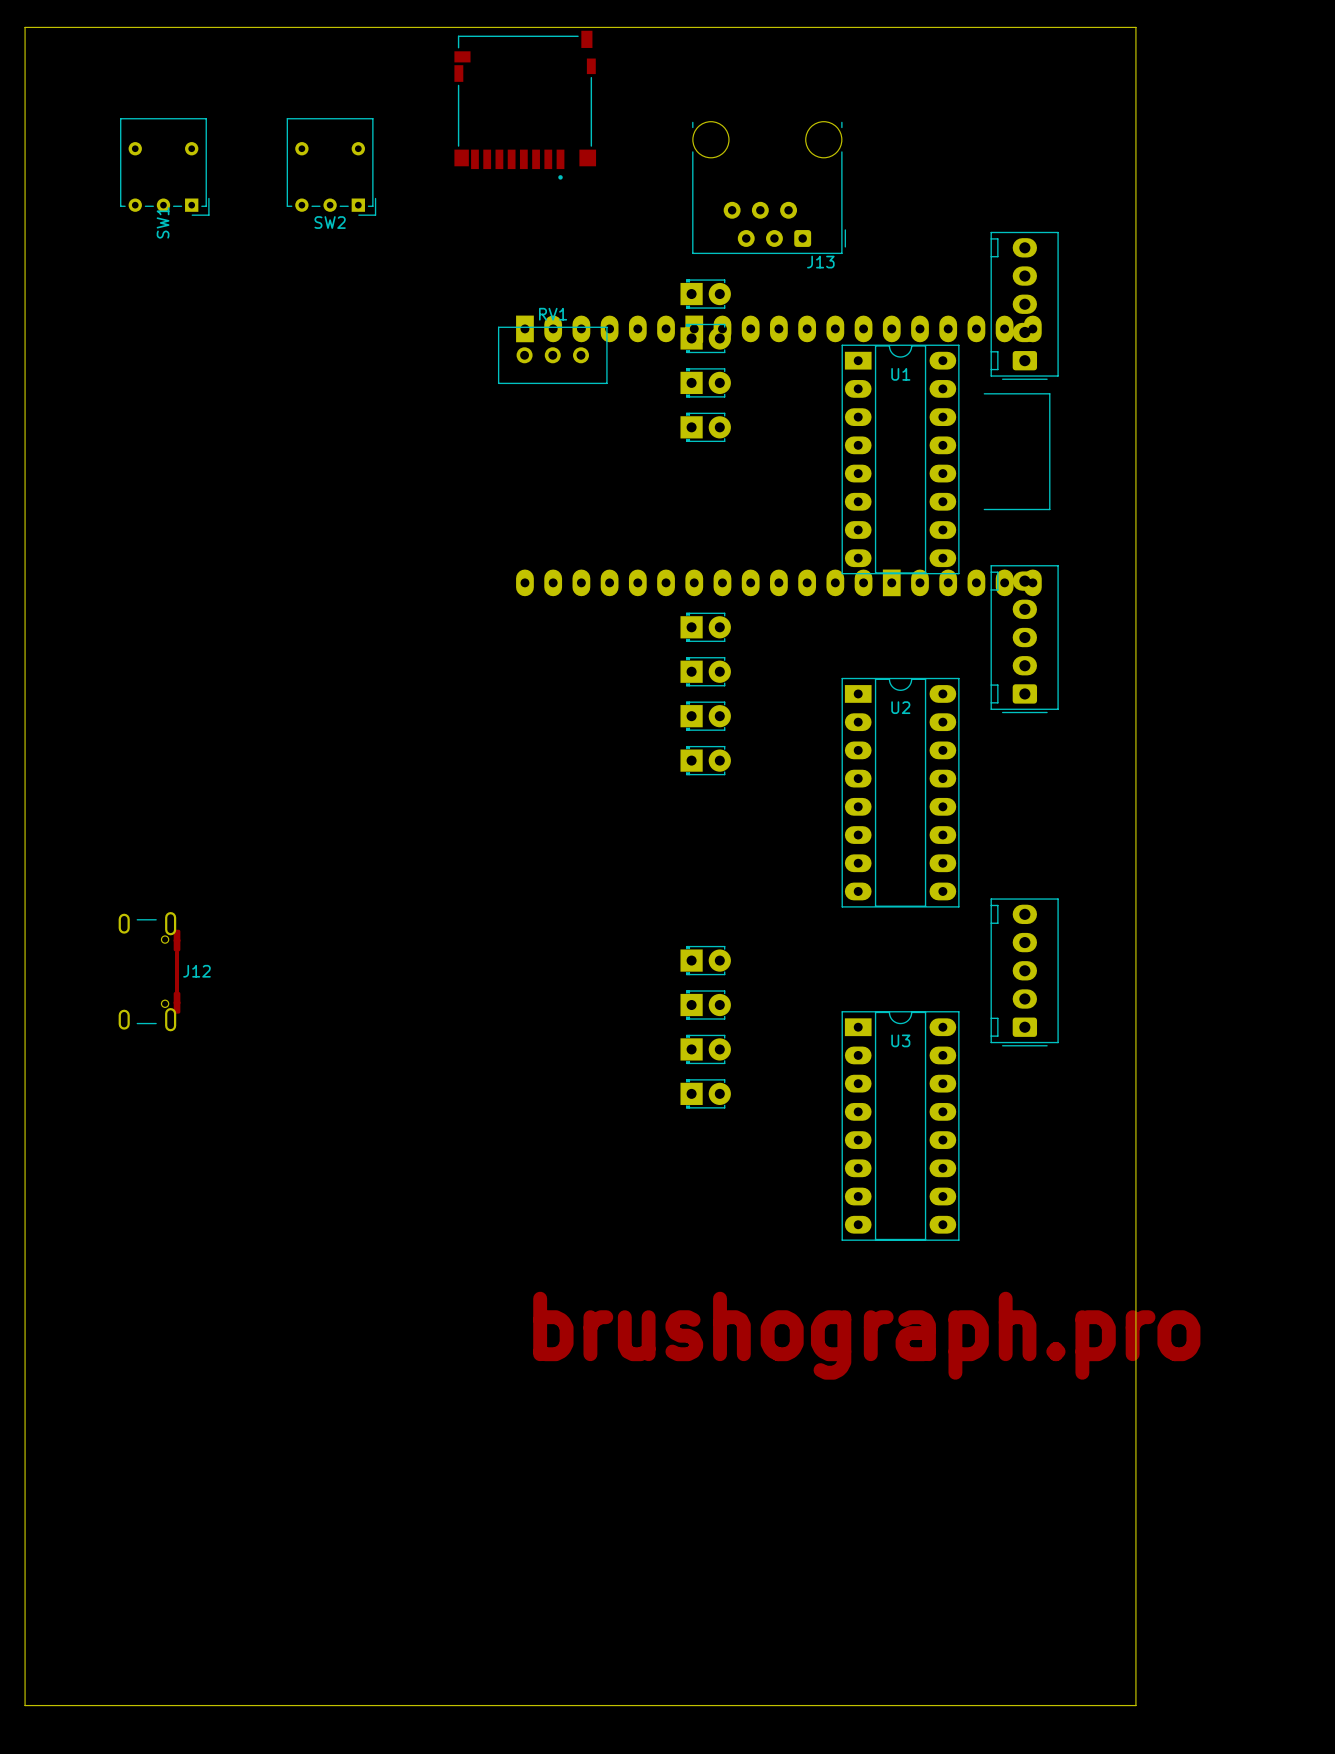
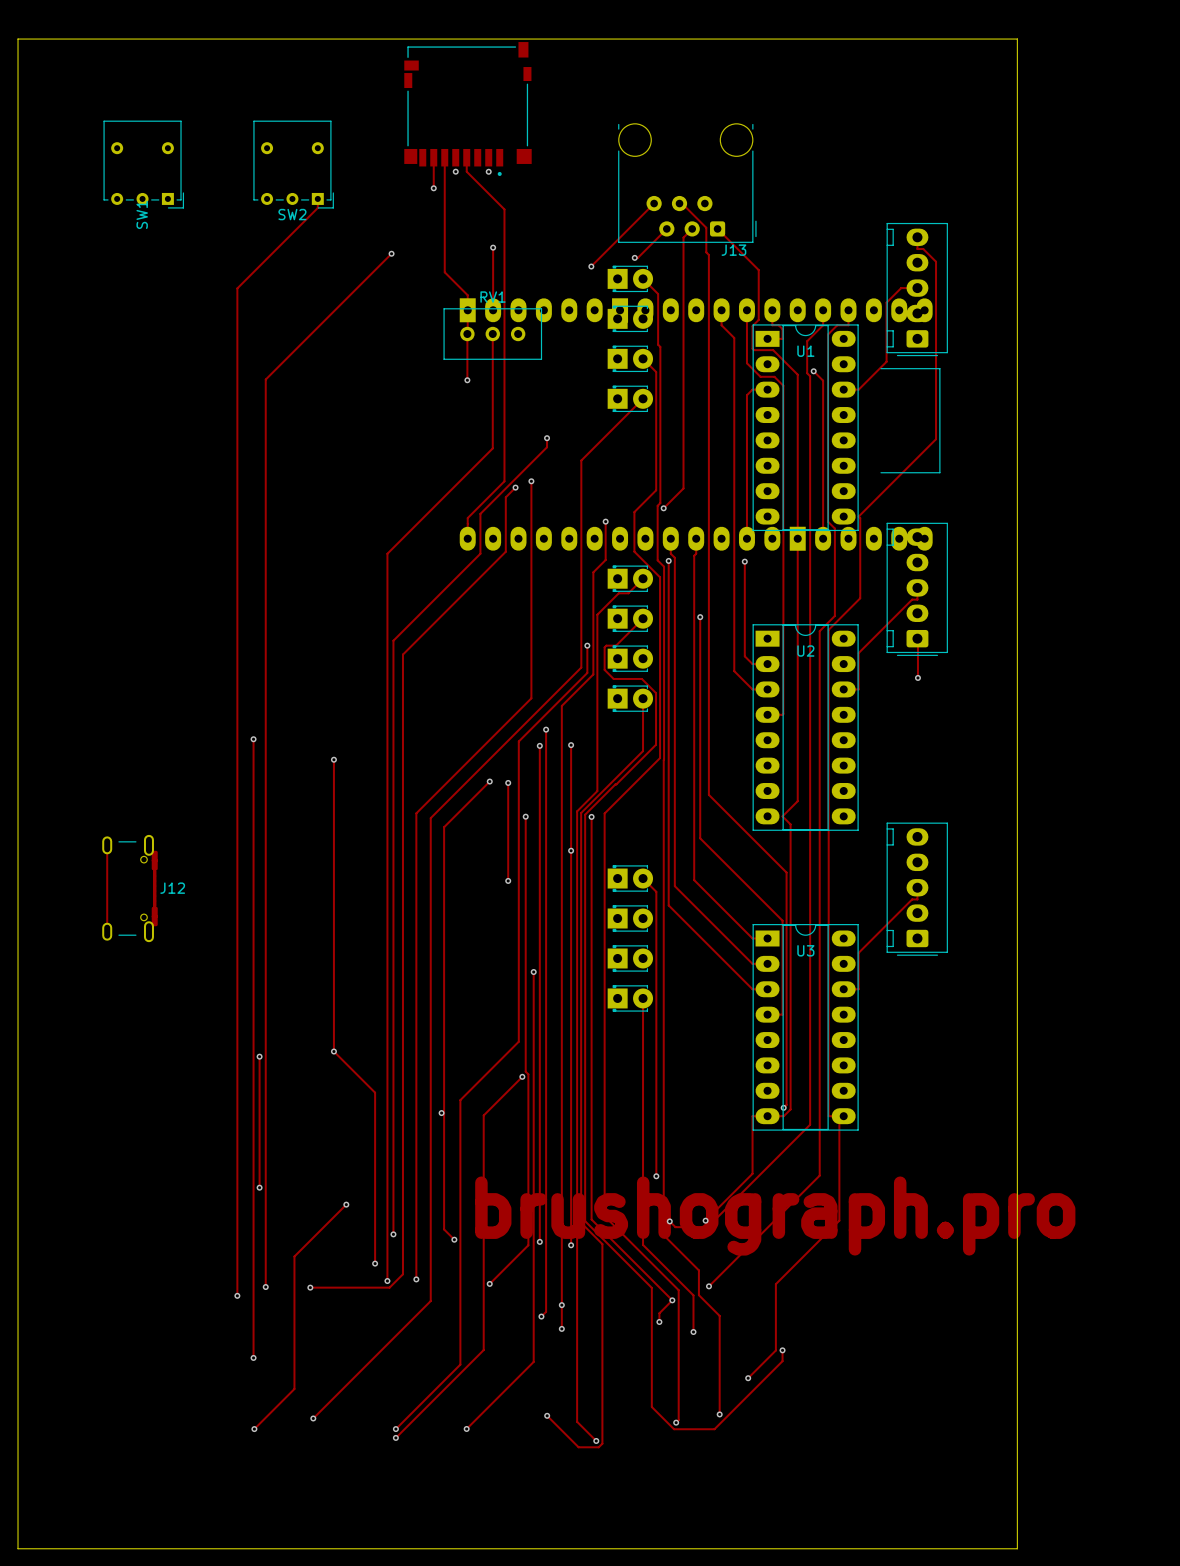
track: none -> (433, 157) (433, 188)
track: none -> (444, 157) (444, 272) (467, 295) (467, 380)
track: none -> (466, 157) (466, 171) (504, 209) (504, 481) (467, 518) (467, 538)
via: none -> (455, 171)
via: none -> (488, 171)
via: none -> (433, 188)
track: none -> (317, 198) (317, 207) (237, 288) (237, 1295)
track: none -> (654, 203) (591, 266)
track: none -> (679, 203) (682, 203) (706, 227) (706, 252) (708, 254) (708, 794) (786, 872) (786, 1104) (783, 1107)
track: none -> (666, 228) (637, 257) (634, 257)
track: none -> (692, 228) (683, 237) (683, 488) (663, 508)
track: none -> (717, 228) (758, 270) (758, 319) (752, 326) (752, 348) (773, 350) (797, 374) (797, 801) (782, 816) (790, 824) (790, 1109) (783, 1116) (752, 1116) (752, 1173) (705, 1220)
track: none -> (917, 237) (917, 249) (923, 249) (936, 261) (936, 439) (858, 516) (860, 598) (828, 629) (828, 1116) (843, 1116)
track: none -> (493, 247) (493, 310)
via: none -> (493, 247)
track: none -> (391, 253) (265, 379) (265, 1287)
via: none -> (391, 253)
via: none -> (634, 257)
via: none -> (591, 266)
track: none -> (643, 278) (658, 293) (658, 344) (660, 346) (660, 503) (657, 505) (657, 560) (664, 566) (663, 1235) (698, 1270) (698, 1295) (719, 1315) (719, 1414)
track: none -> (917, 288) (901, 288) (886, 302) (886, 361) (858, 389) (843, 389)
track: none -> (721, 310) (721, 325) (734, 337) (734, 671) (752, 689) (767, 689)
track: none -> (746, 310) (746, 363) (760, 376) (774, 376) (783, 385) (783, 713) (767, 714)
track: none -> (772, 310) (772, 325) (778, 325) (782, 329) (782, 338) (767, 338)
track: none -> (823, 310) (823, 325) (807, 341) (807, 373) (810, 376) (810, 1124) (707, 1227) (675, 1227) (669, 1221)
track: none -> (848, 310) (848, 325) (837, 325) (828, 334) (828, 521) (834, 528) (834, 615) (819, 631) (819, 1175) (708, 1286)
track: none -> (492, 333) (492, 448) (387, 553) (387, 1281)
track: none -> (643, 358) (656, 372) (656, 490) (634, 512) (634, 551) (660, 577) (660, 758) (604, 813) (604, 1216) (678, 1290) (678, 1420) (676, 1422)
track: none -> (813, 371) (823, 380) (823, 538)
via: none -> (813, 371)
via: none -> (467, 380)
track: none -> (767, 389) (752, 389) (746, 395) (746, 538)
track: none -> (643, 398) (581, 460) (581, 667) (430, 818) (430, 1301) (313, 1418)
track: none -> (547, 438) (547, 447) (480, 513) (480, 553) (393, 640) (393, 1234)
via: none -> (547, 438)
track: none -> (531, 481) (531, 698) (416, 813) (416, 1279)
via: none -> (531, 481)
track: none -> (515, 487) (505, 497) (505, 551) (402, 654) (402, 1274) (389, 1287) (310, 1287)
via: none -> (515, 487)
via: none -> (663, 508)
track: none -> (605, 521) (605, 560) (593, 572) (593, 674) (561, 705) (561, 1328)
via: none -> (605, 521)
track: none -> (670, 538) (670, 553) (674, 557) (674, 886) (752, 963) (767, 963)
track: none -> (696, 538) (696, 553) (694, 555) (694, 880) (752, 938) (767, 938)
track: none -> (668, 560) (668, 905) (752, 989) (767, 989)
via: none -> (668, 560)
track: none -> (744, 561) (744, 656) (752, 664) (767, 664)
via: none -> (744, 561)
track: none -> (643, 578) (628, 593) (618, 593) (597, 614) (597, 791) (577, 811) (577, 1421) (596, 1440)
track: none -> (917, 587) (917, 599) (912, 599) (858, 653) (858, 689) (843, 689)
track: none -> (700, 617) (700, 838) (782, 920) (782, 1014) (767, 1014)
via: none -> (700, 617)
track: none -> (643, 618) (616, 645) (604, 647) (604, 669) (613, 678) (641, 678) (656, 693) (656, 744) (585, 814) (585, 1221) (651, 1287) (651, 1407) (674, 1429) (714, 1429) (782, 1361) (782, 1350)
track: none -> (917, 638) (917, 677)
track: none -> (587, 645) (587, 672) (518, 741) (518, 1041) (460, 1100) (460, 1364) (395, 1429)
via: none -> (587, 645)
via: none -> (917, 677)
track: none -> (643, 698) (643, 751) (581, 813) (581, 1222) (602, 1244) (602, 1443) (598, 1447) (578, 1447) (547, 1415)
track: none -> (546, 729) (546, 1311) (541, 1316)
via: none -> (546, 729)
track: none -> (253, 739) (253, 1357)
via: none -> (253, 739)
track: none -> (571, 745) (571, 1245)
via: none -> (571, 745)
track: none -> (539, 745) (539, 1241)
via: none -> (539, 745)
track: none -> (333, 759) (333, 1051) (375, 1092) (375, 1263)
via: none -> (333, 759)
track: none -> (489, 781) (444, 827) (444, 1229) (454, 1239)
via: none -> (489, 781)
track: none -> (508, 782) (508, 880)
via: none -> (508, 782)
track: none -> (525, 816) (525, 1071) (528, 1074) (528, 1245) (489, 1283)
via: none -> (525, 816)
track: none -> (591, 816) (591, 1219) (672, 1300) (659, 1313) (659, 1321)
via: none -> (591, 816)
track: none -> (107, 845) (107, 931)
via: none -> (571, 850)
track: none -> (643, 878) (656, 891) (656, 1176)
via: none -> (508, 880)
track: none -> (917, 887) (917, 899) (912, 899) (858, 952) (858, 989) (843, 989)
track: none -> (533, 972) (533, 1361) (466, 1428)
via: none -> (533, 972)
track: none -> (643, 998) (643, 1244) (693, 1295) (693, 1332)
via: none -> (333, 1051)
track: none -> (259, 1056) (259, 1187)
via: none -> (259, 1056)
track: none -> (522, 1076) (483, 1115) (483, 1350) (395, 1437)
via: none -> (522, 1076)
via: none -> (783, 1107)
via: none -> (441, 1113)
track: none -> (839, 1116) (839, 1220) (775, 1284) (775, 1350) (748, 1378)
via: none -> (656, 1176)
via: none -> (259, 1187)
track: none -> (346, 1204) (294, 1256) (294, 1389) (254, 1429)
via: none -> (346, 1204)
via: none -> (705, 1220)
via: none -> (669, 1221)
via: none -> (393, 1234)
via: none -> (454, 1239)
via: none -> (539, 1241)
via: none -> (571, 1245)
via: none -> (375, 1263)
via: none -> (416, 1279)
via: none -> (387, 1281)
via: none -> (489, 1283)
via: none -> (708, 1286)
via: none -> (265, 1287)
via: none -> (310, 1287)
via: none -> (237, 1295)
via: none -> (672, 1300)
via: none -> (561, 1305)
via: none -> (541, 1316)
via: none -> (659, 1321)
via: none -> (561, 1328)
via: none -> (693, 1332)
via: none -> (782, 1350)
via: none -> (253, 1357)
via: none -> (748, 1378)
via: none -> (719, 1414)
via: none -> (547, 1415)
via: none -> (313, 1418)
via: none -> (676, 1422)
via: none -> (254, 1429)
via: none -> (395, 1429)
via: none -> (466, 1428)
via: none -> (395, 1437)
via: none -> (596, 1440)

